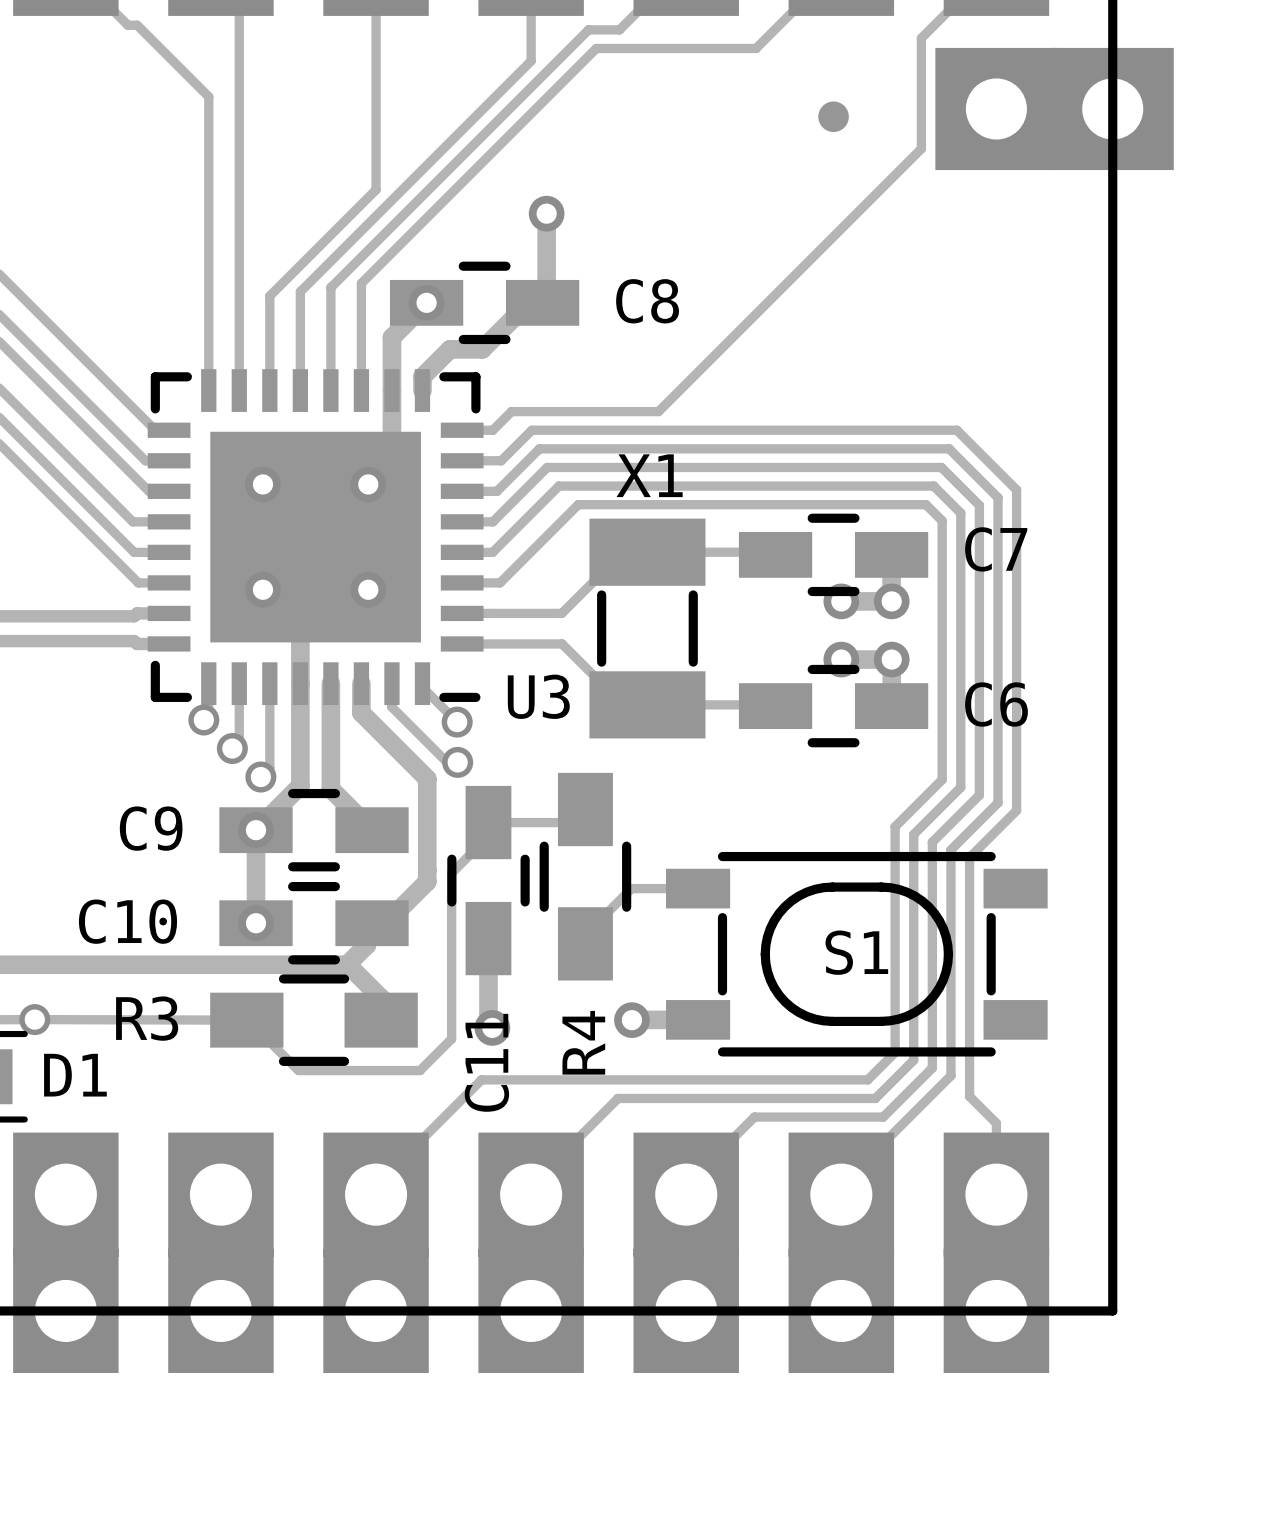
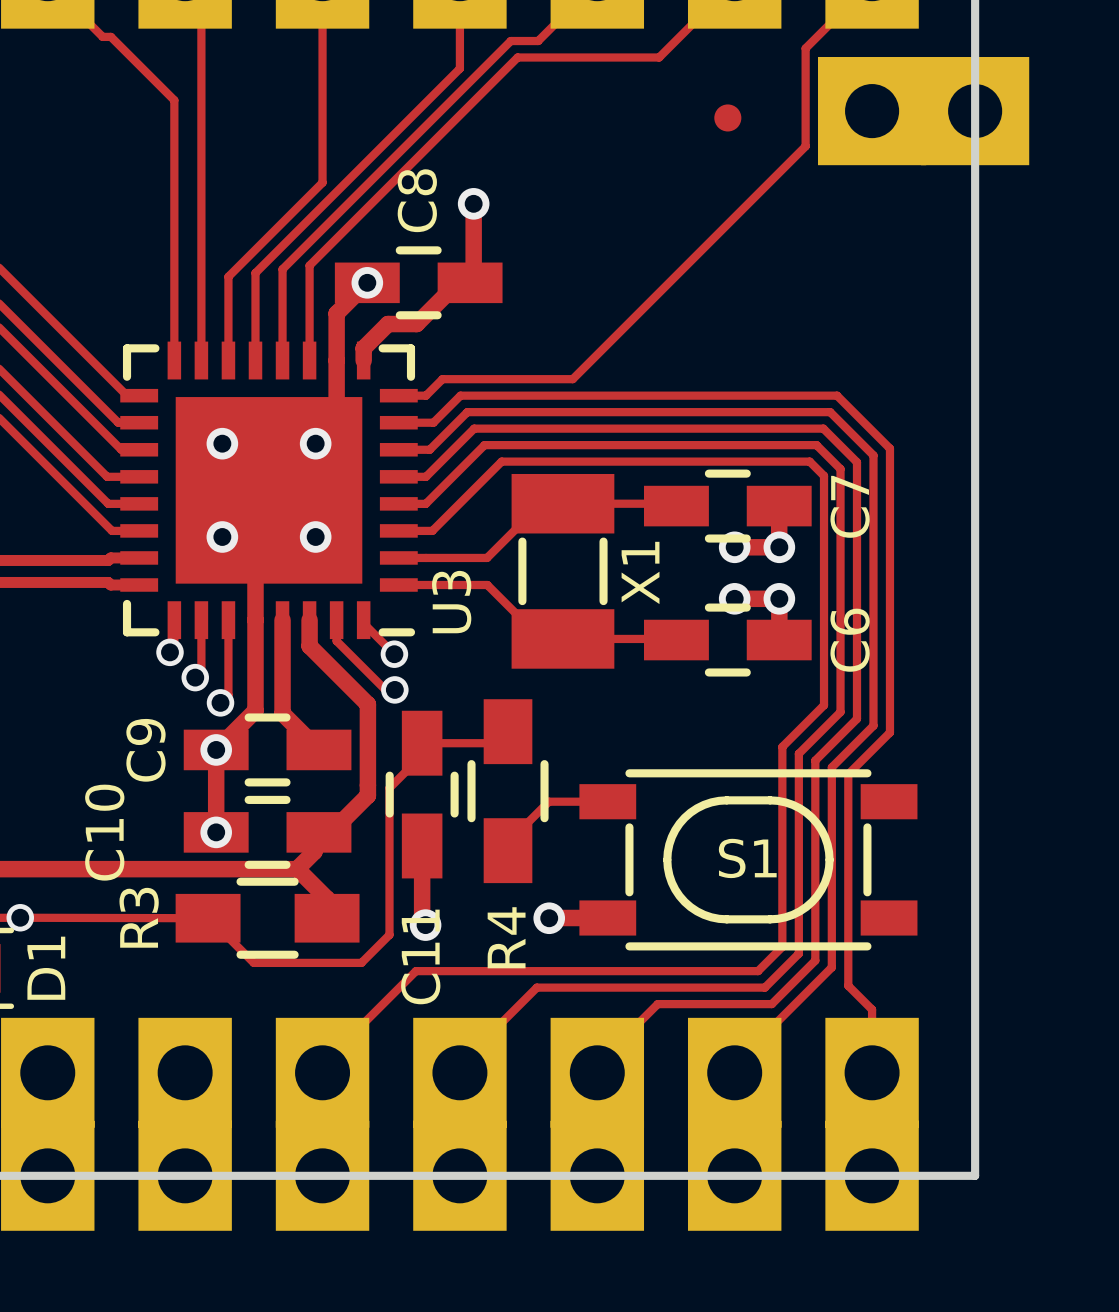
C8 name rotation: 0° (647, 301) -> 90° counterclockwise (417, 200)
C8 name position: C8 (647, 301) -> C8 (417, 200)
X1 name rotation: 0° (649, 475) -> 90° counterclockwise (640, 572)
X1 name position: X1 (649, 475) -> X1 (640, 572)
C7 name rotation: 0° (996, 549) -> 90° counterclockwise (850, 506)
U3 name rotation: 0° (538, 696) -> 90° counterclockwise (451, 602)
C6 name rotation: 0° (996, 704) -> 90° counterclockwise (850, 640)
C9 name rotation: 0° (151, 828) -> 90° counterclockwise (145, 750)
C10 name rotation: 0° (127, 921) -> 90° counterclockwise (104, 832)
R3 name rotation: 0° (147, 1018) -> 90° counterclockwise (139, 917)
D1 name rotation: 0° (75, 1075) -> 90° counterclockwise (46, 968)

